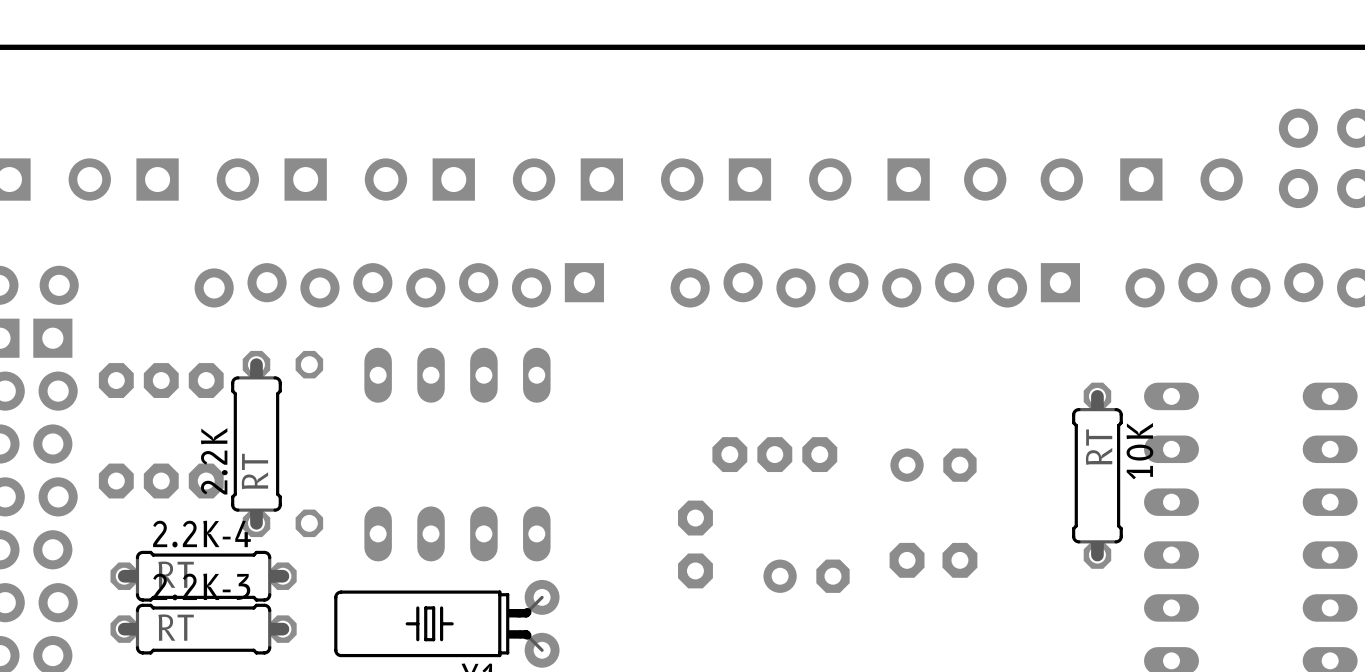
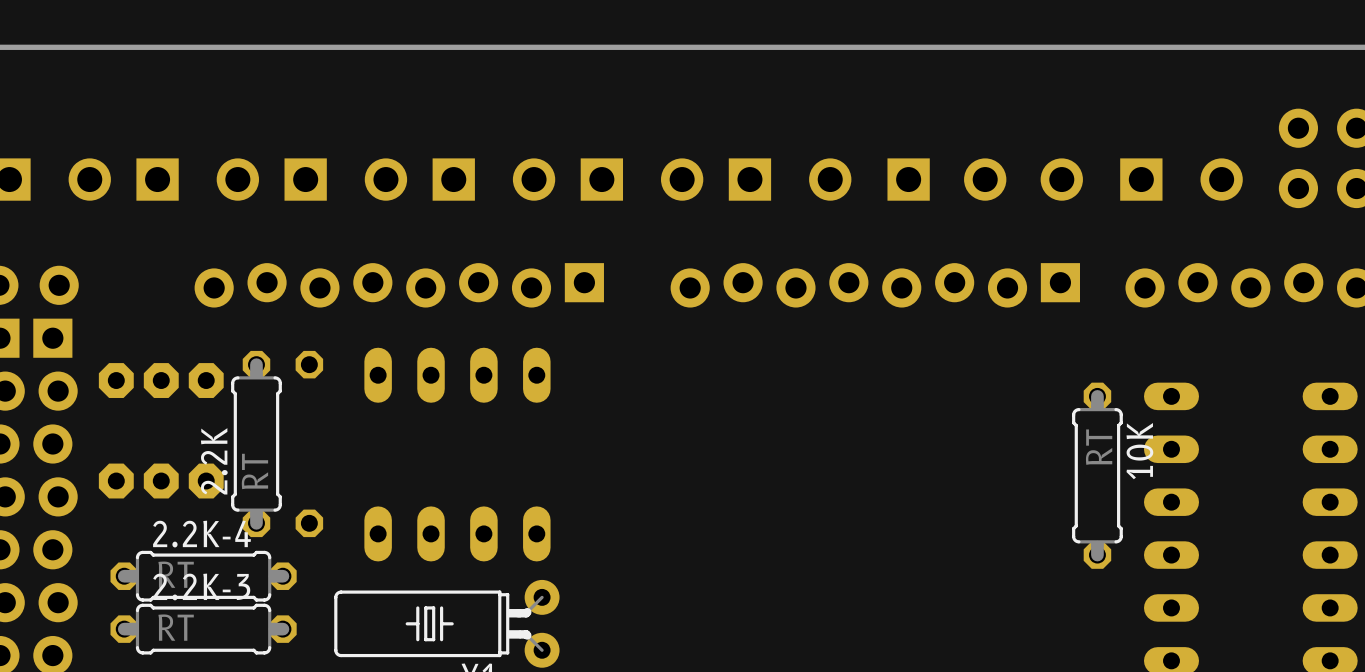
part: (774, 454) -> none
part: (933, 465) -> none
part: (695, 544) -> none
part: (933, 560) -> none
part: (806, 576) -> none

